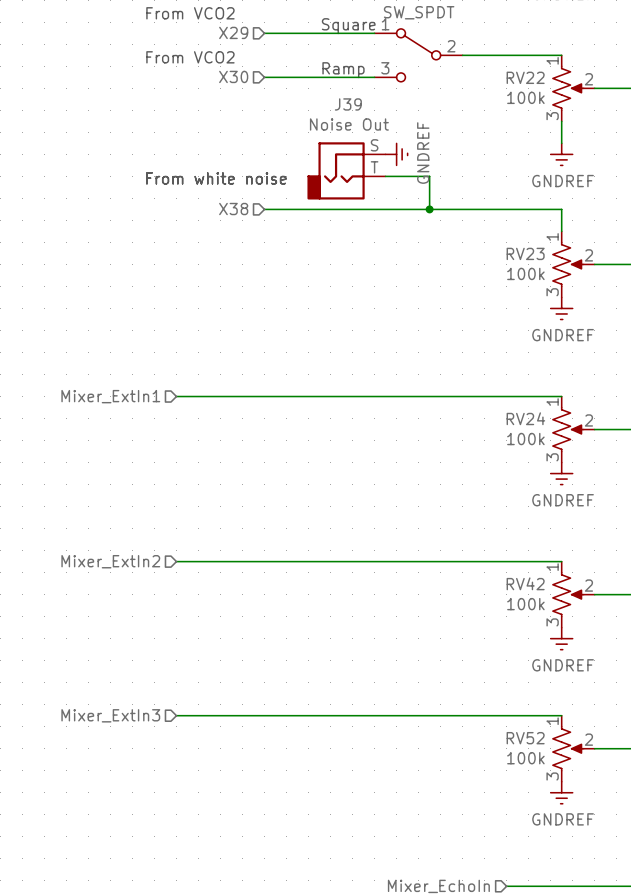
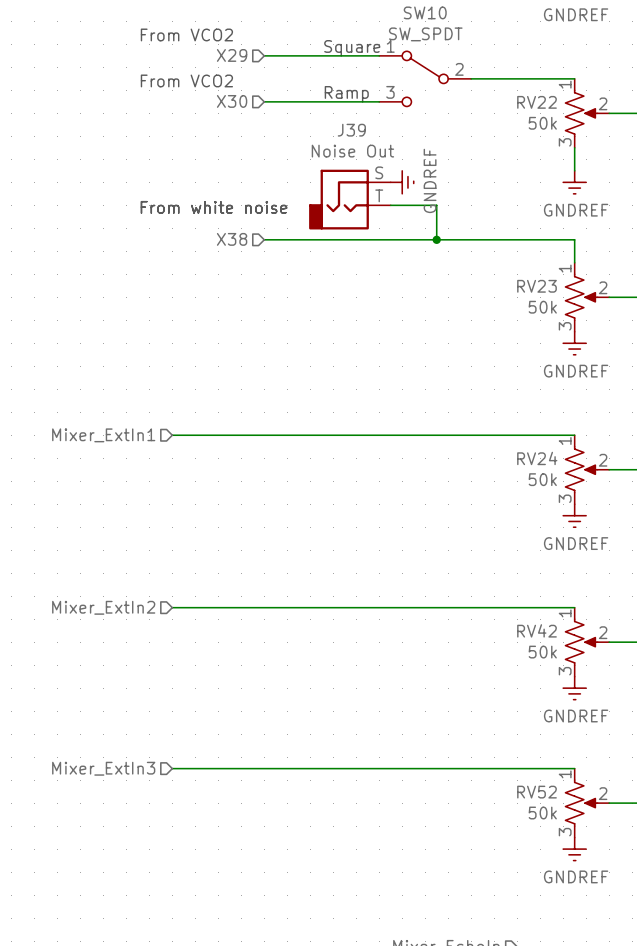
RV22 value: 100k (525, 97) -> 50k (542, 123)
RV23 value: 100k (525, 273) -> 50k (542, 307)
RV24 value: 100k (525, 439) -> 50k (542, 479)
RV42 value: 100k (525, 604) -> 50k (542, 652)
RV52 value: 100k (525, 758) -> 50k (542, 813)

